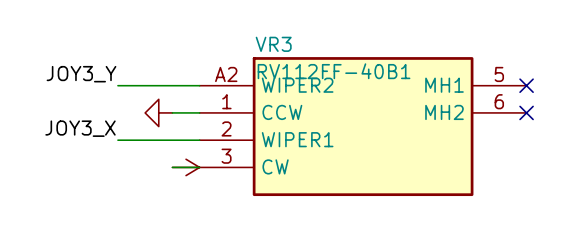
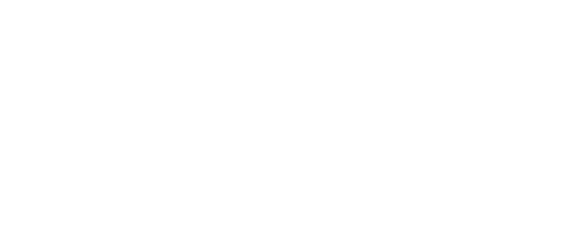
label: JOY3_Y (81, 74) -> none
wire: (117, 85) (199, 85) -> none
no-connect mark: (526, 85) -> none
power symbol: (158, 112) -> none
wire: (172, 112) (199, 112) -> none
no-connect mark: (526, 112) -> none
VR3: RV112FF-40B1 (363, 126) -> none
label: JOY3_X (80, 128) -> none
wire: (117, 140) (199, 140) -> none
wire: (172, 167) (199, 167) -> none
power symbol: (186, 167) -> none

